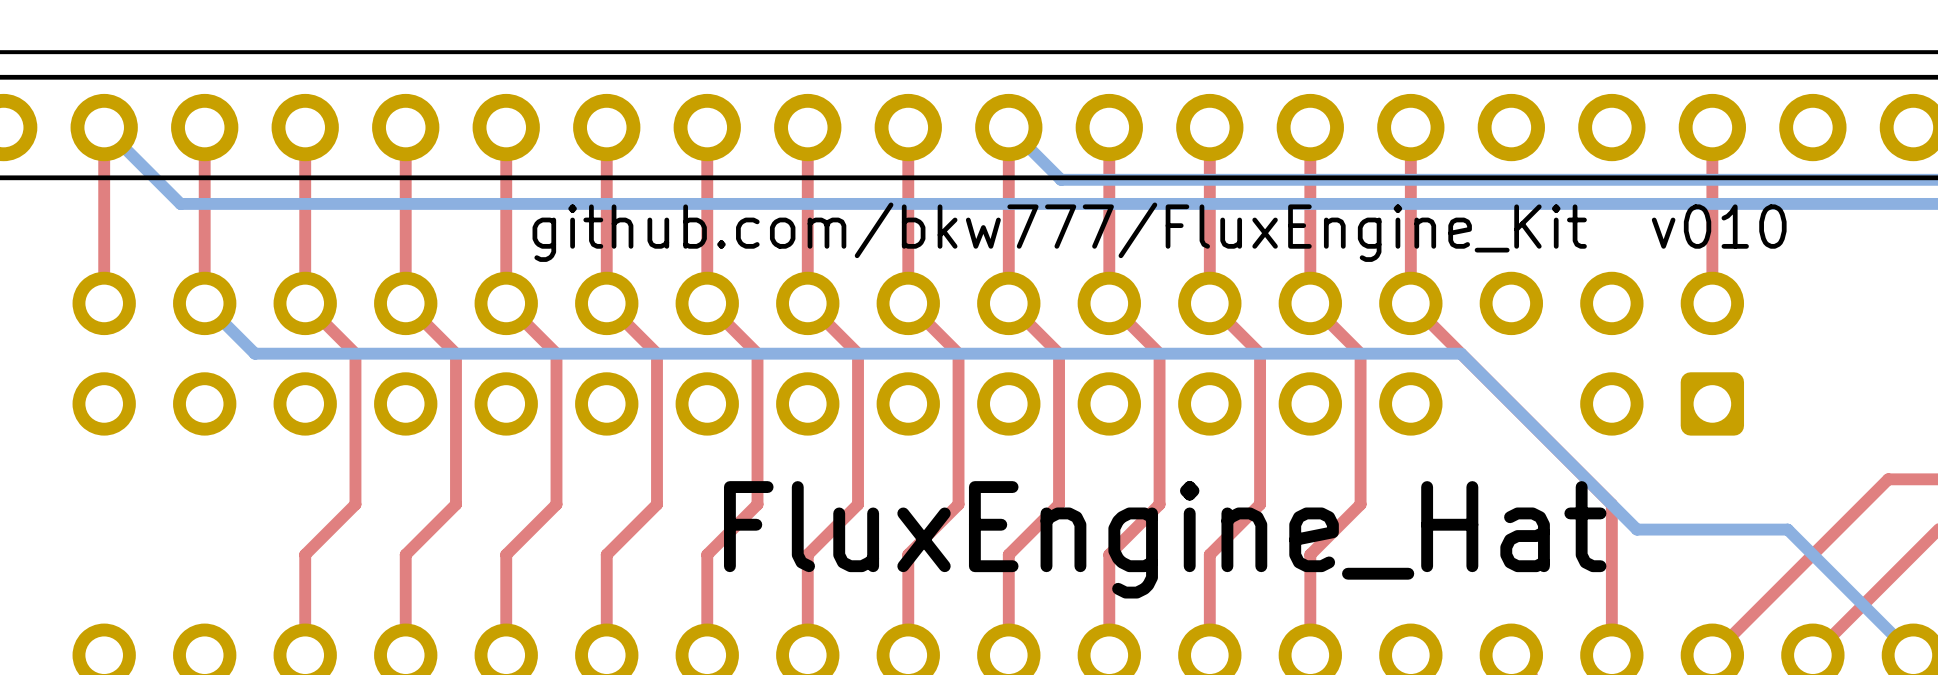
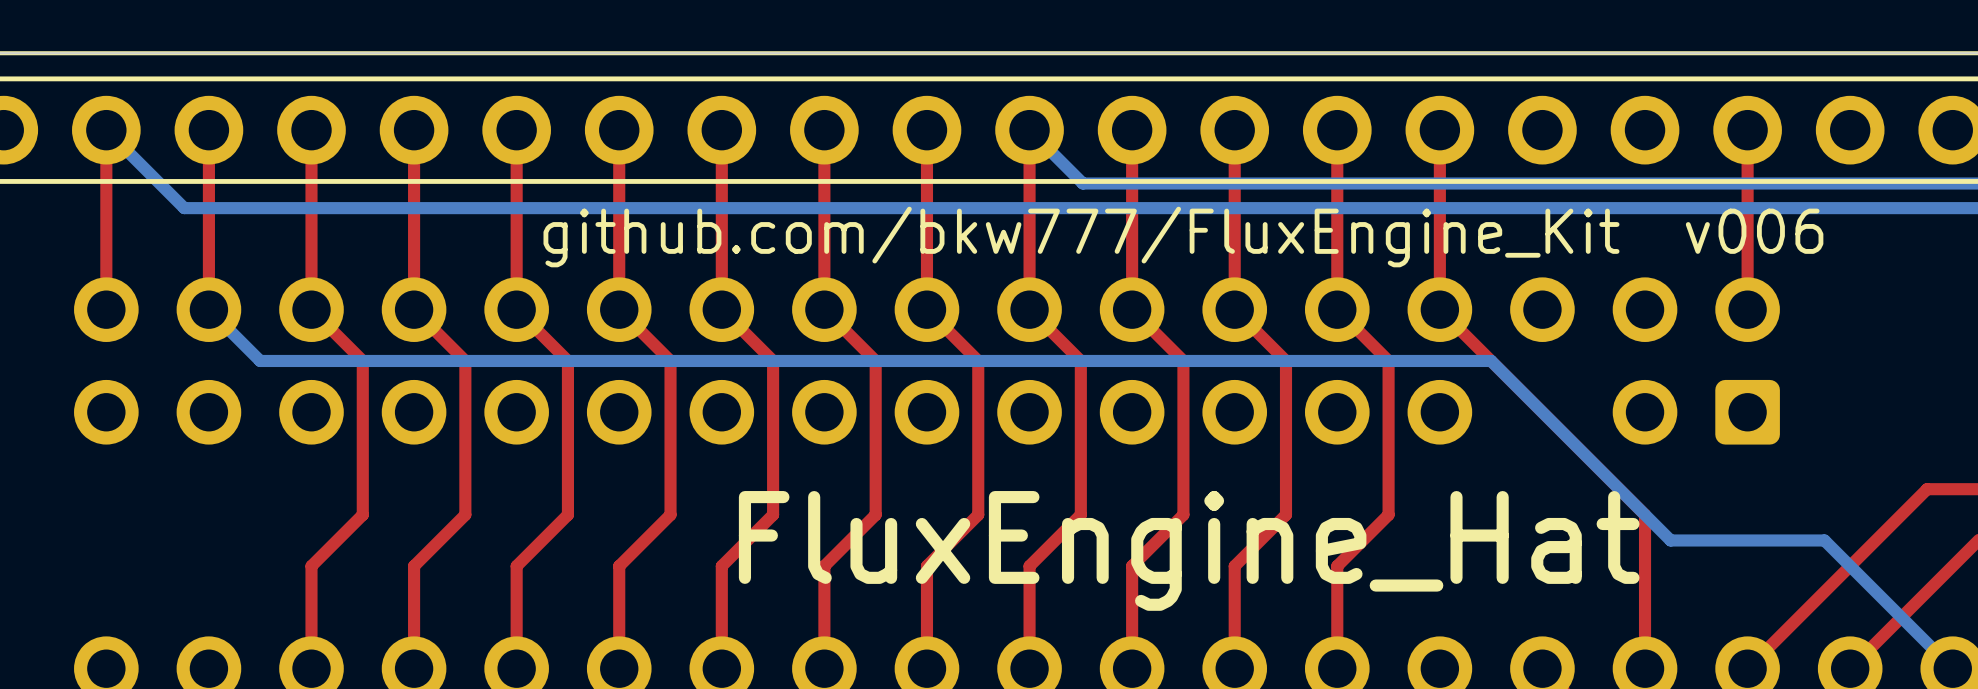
text: github.com/bkw777/FluxEngine_Kit v010 (1159, 232) -> github.com/bkw777/FluxEngine_Kit v006 (1183, 237)

